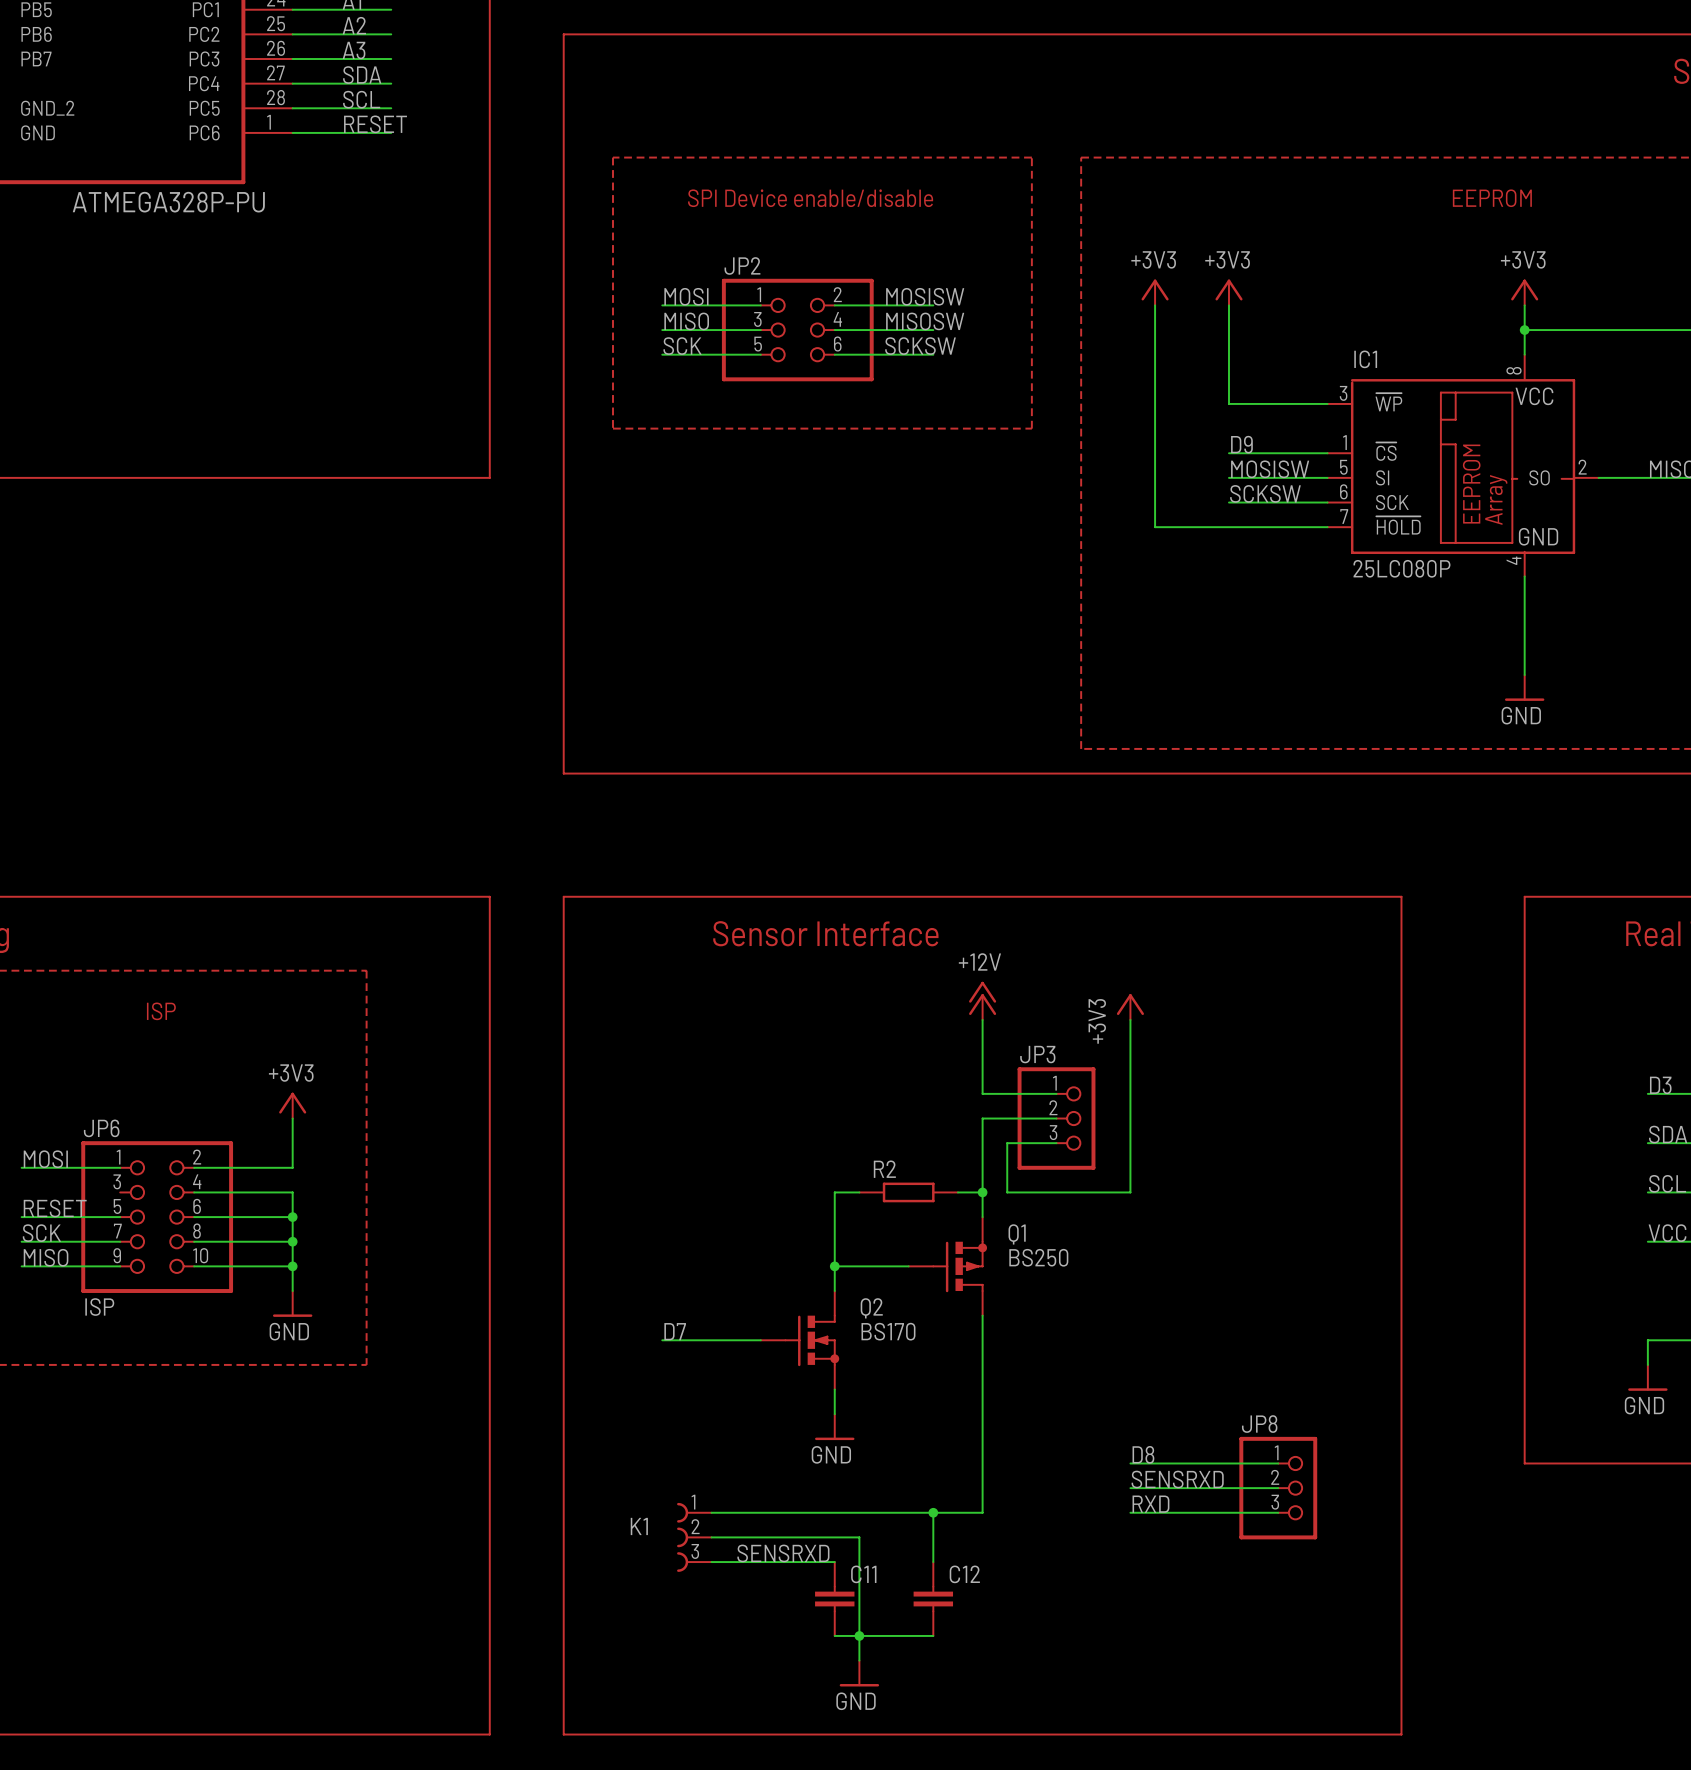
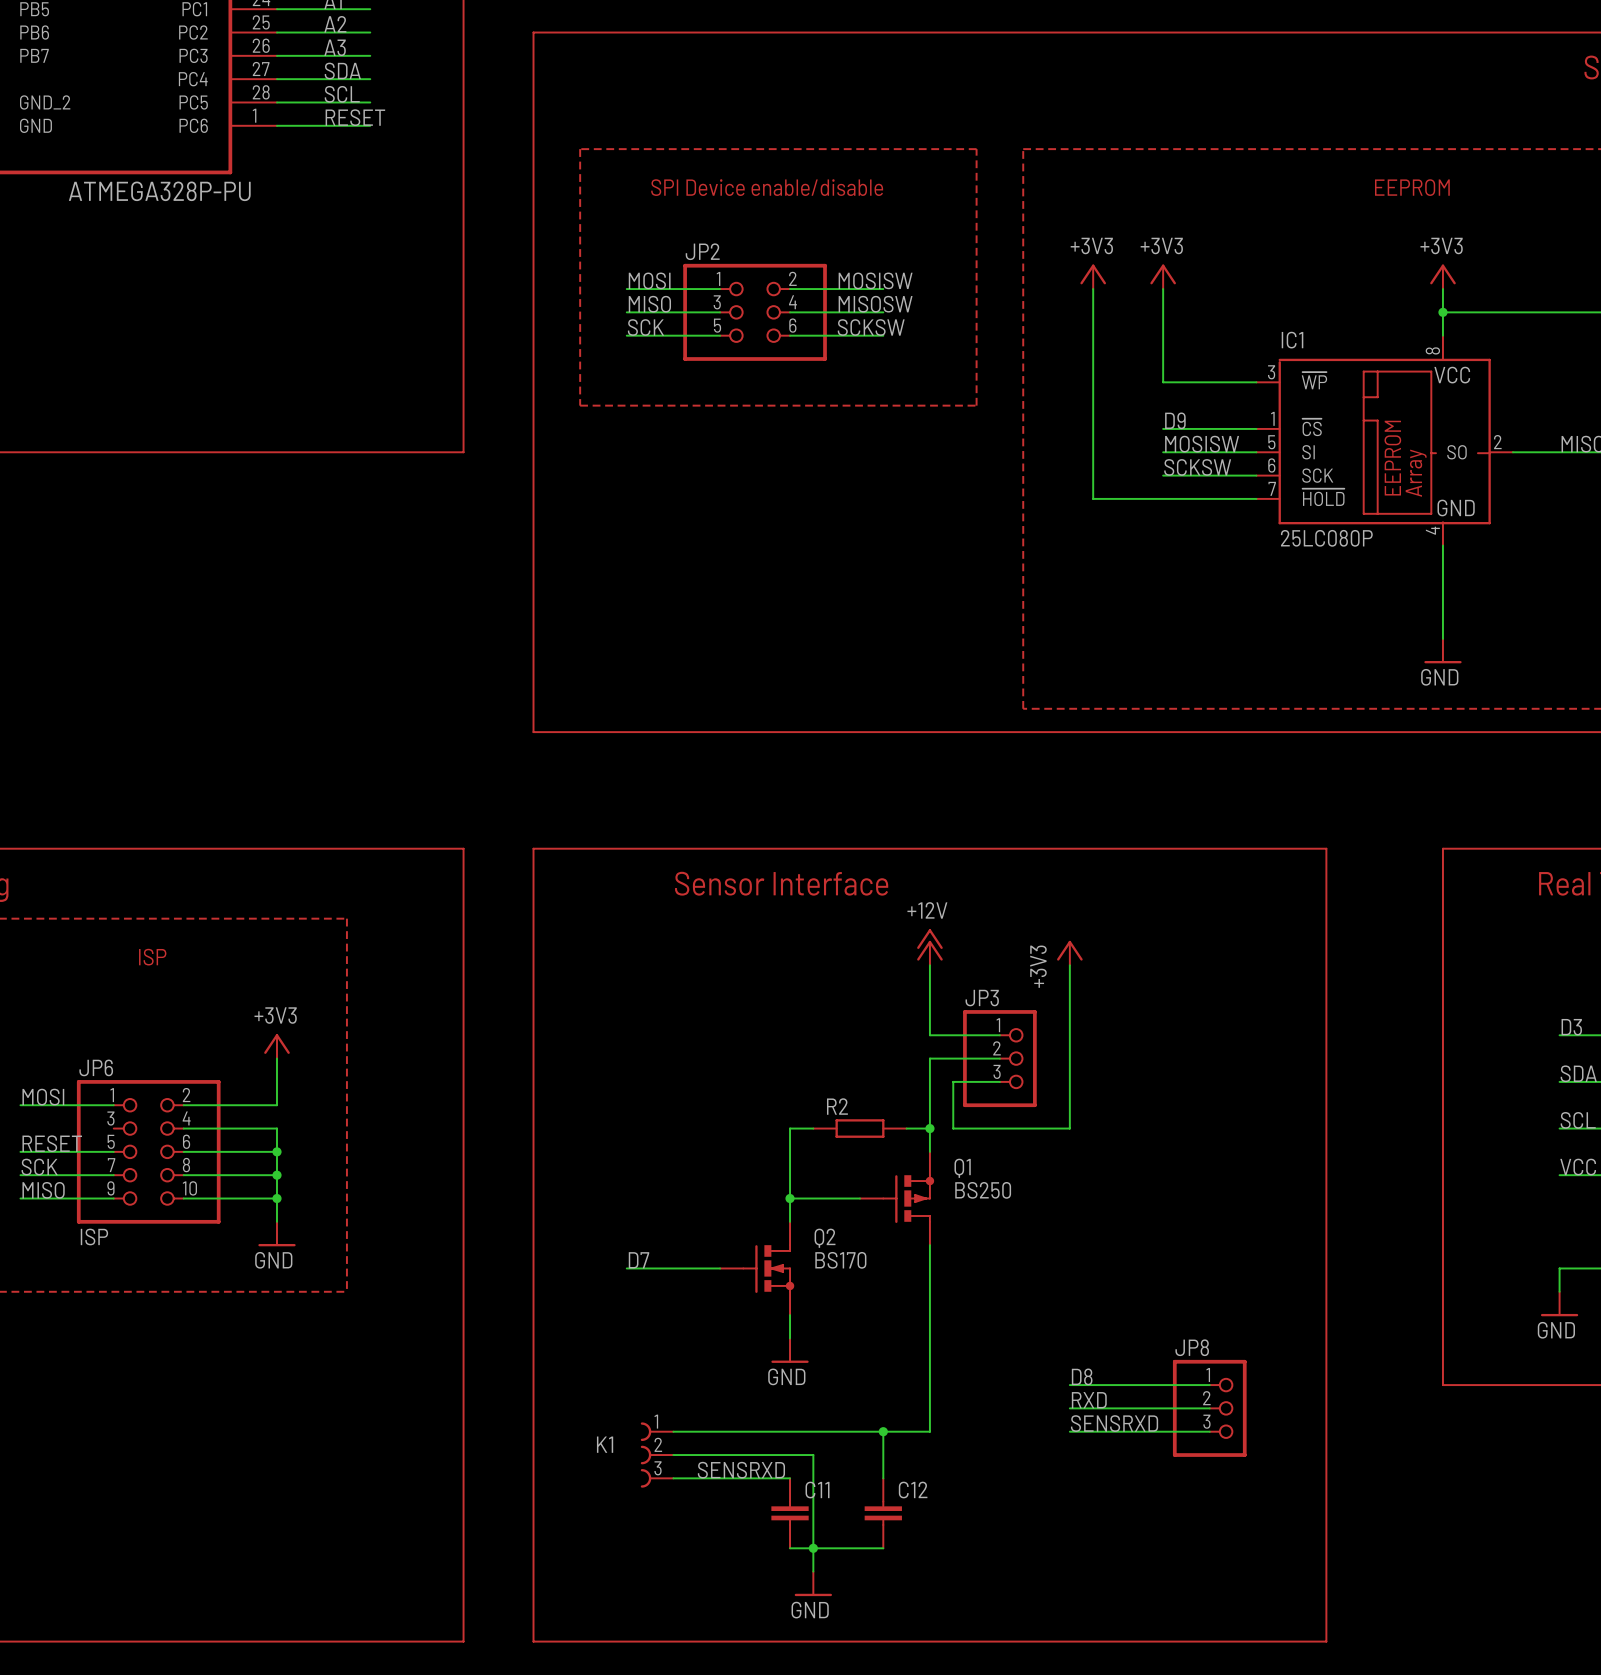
label: SENSRXD (1177, 1479) -> RXD (1089, 1400)
label: RXD (1150, 1504) -> SENSRXD (1114, 1423)

